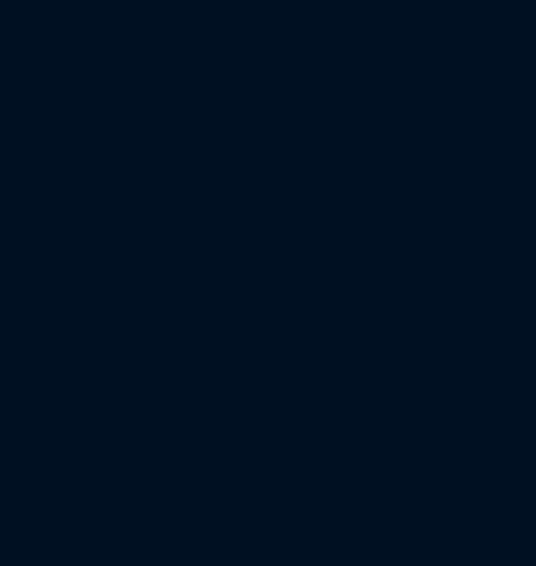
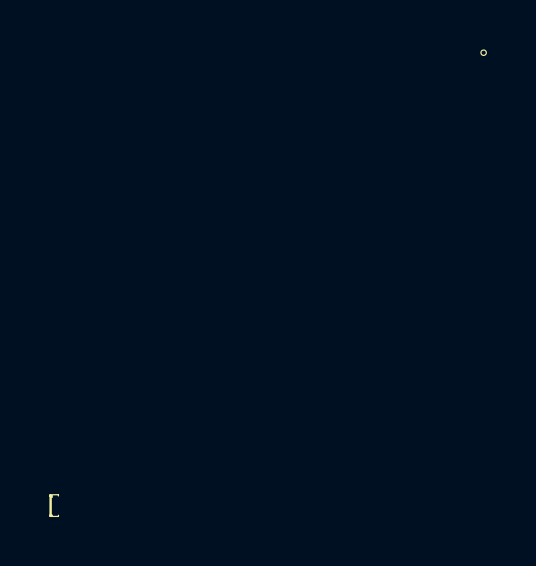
drawing: none -> [480, 49, 487, 57]
line: none -> (52, 495) (50, 495)
line: none -> (58, 495) (50, 494) (50, 516) (58, 515)
line: none -> (52, 497) (51, 515)
line: none -> (52, 515) (50, 515)

